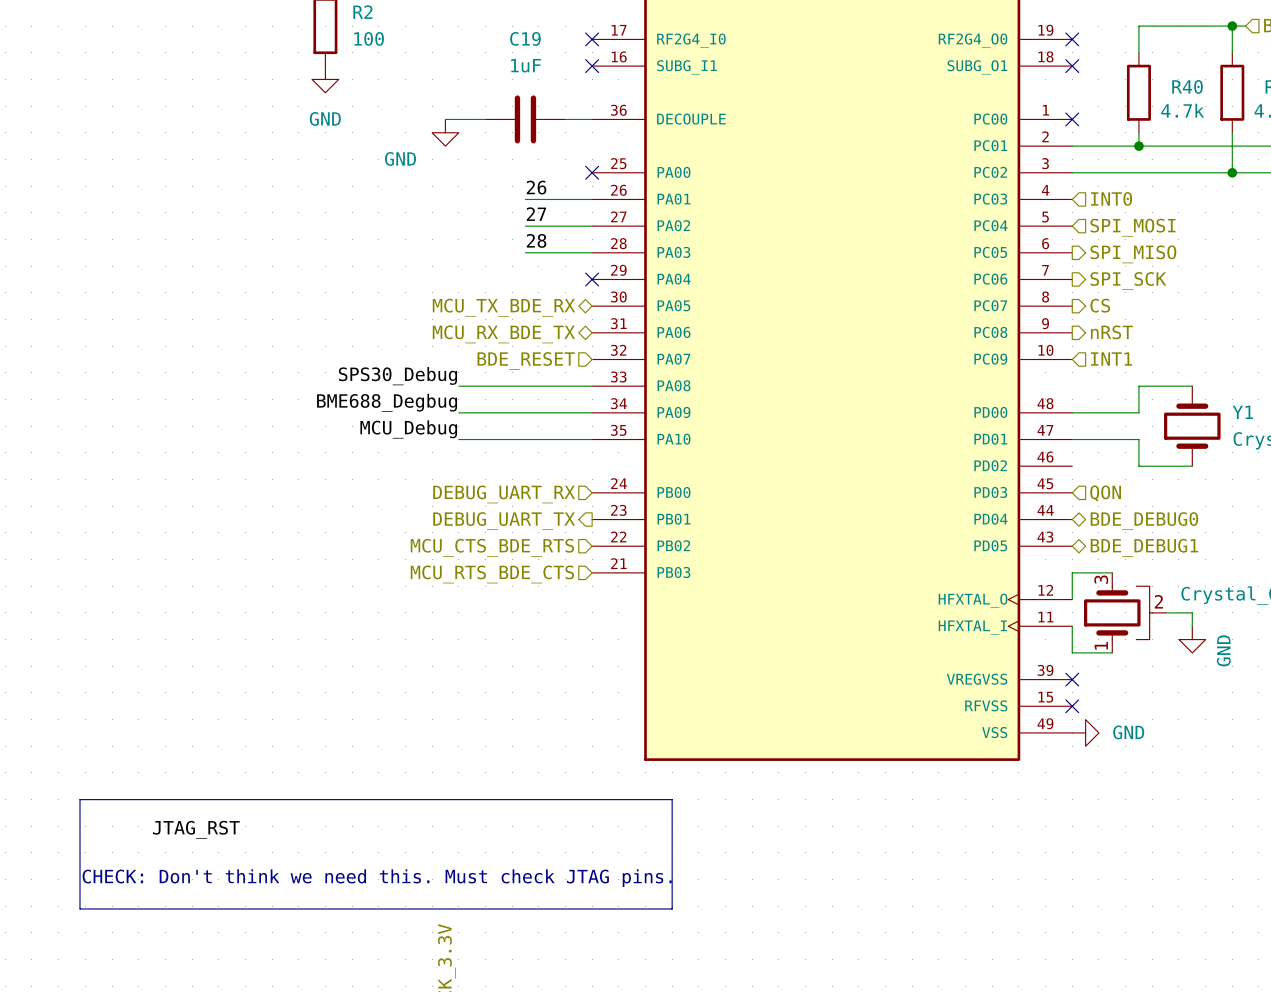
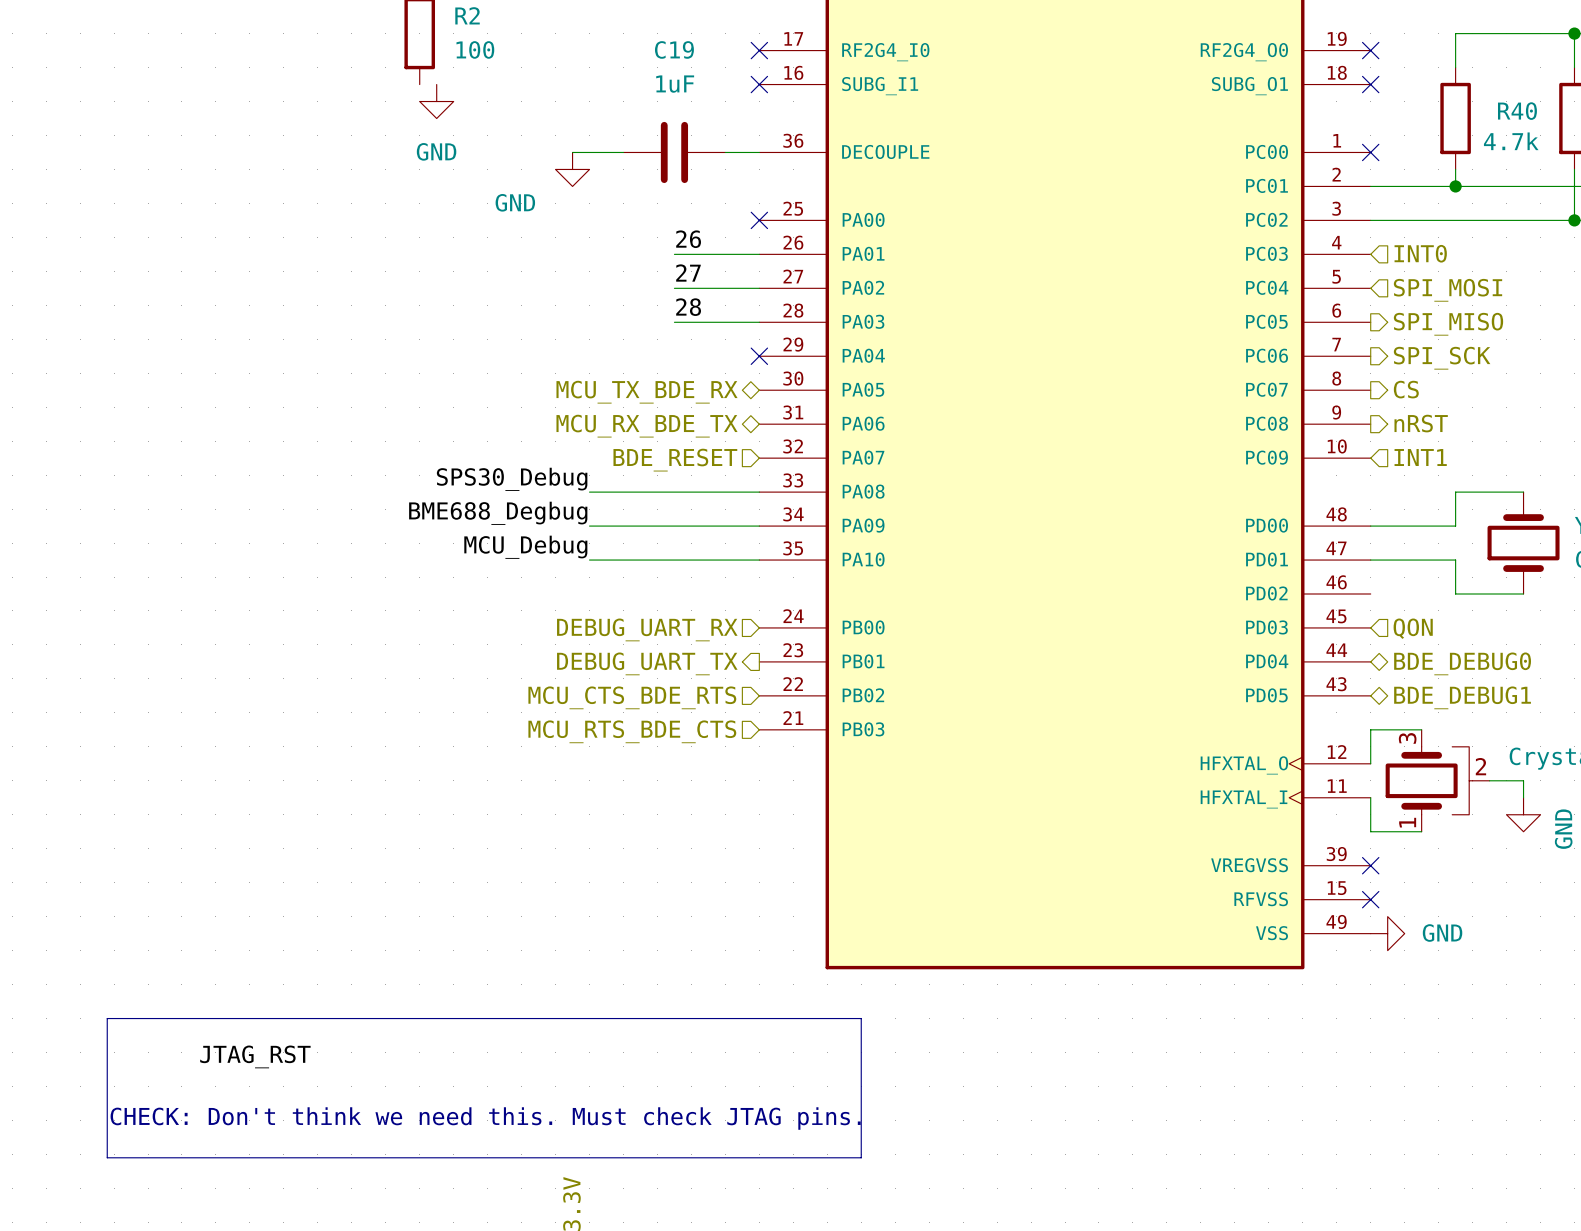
power symbol position: GND (325, 79) -> GND (436, 101)

